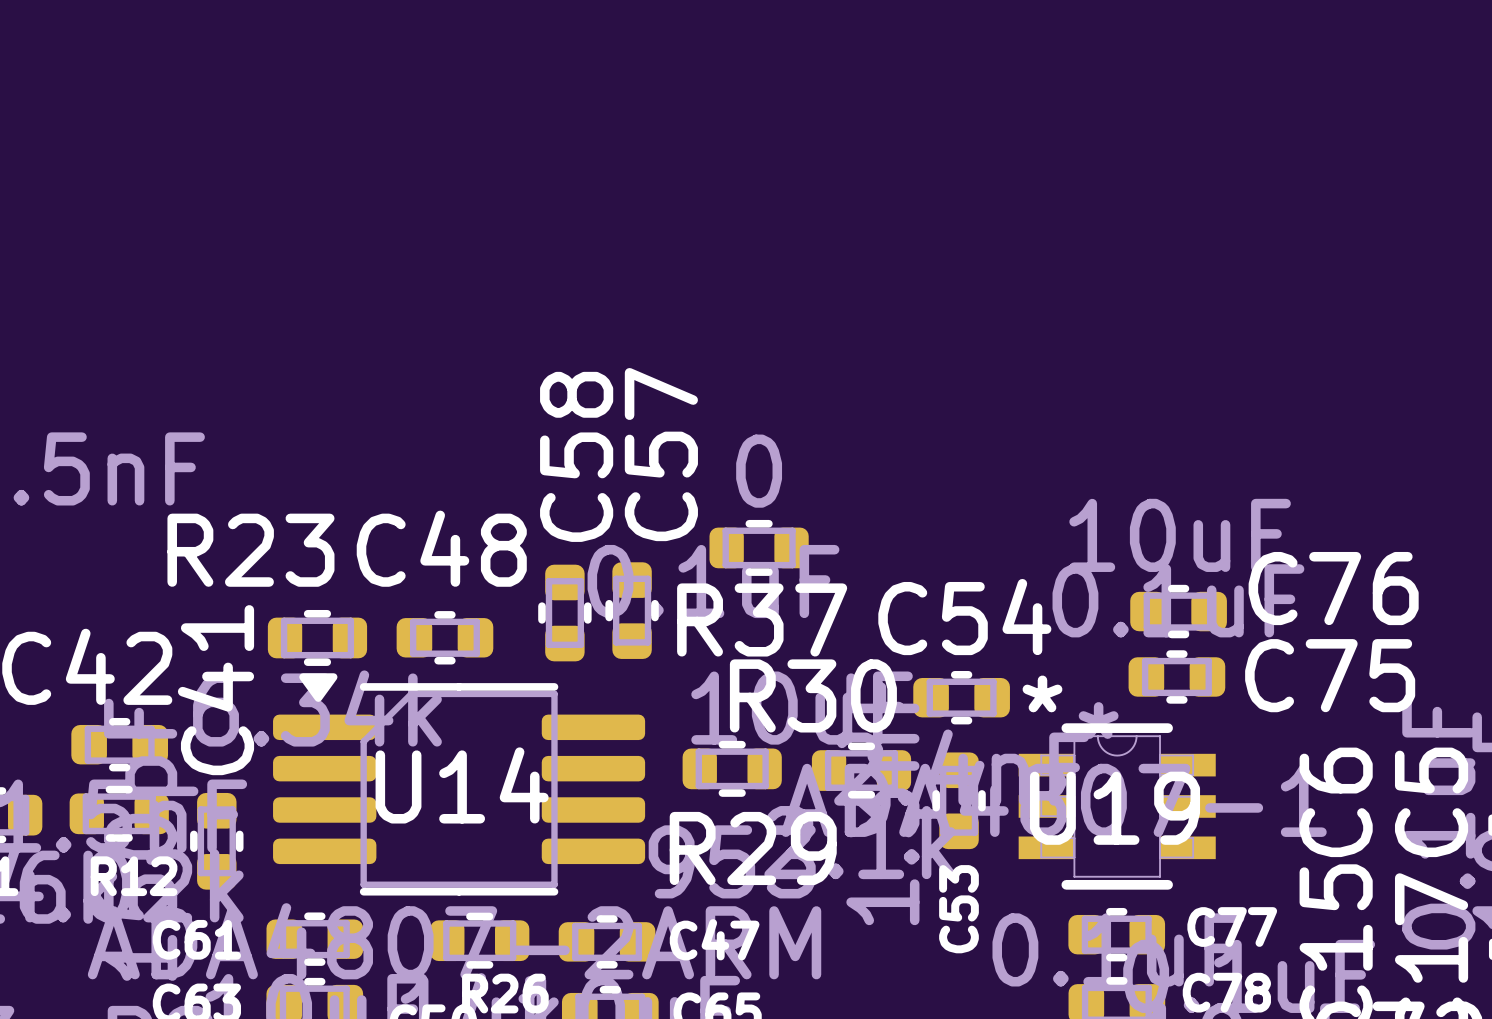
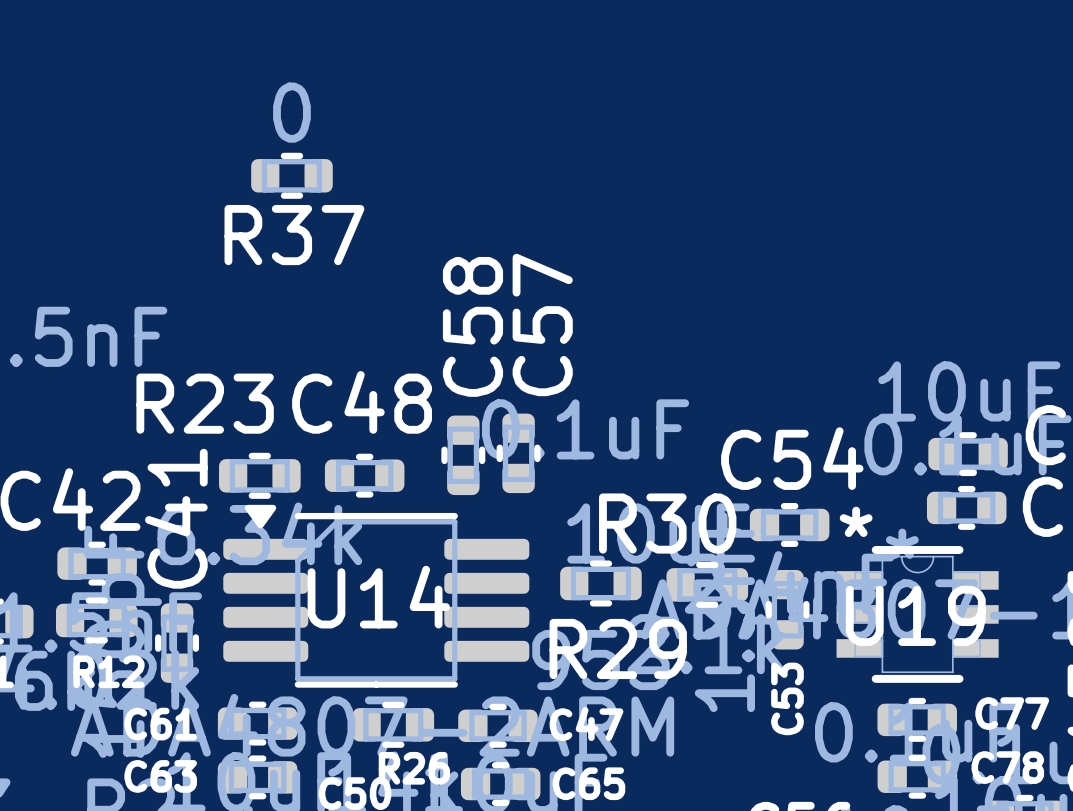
R37 position: (759, 547) -> (291, 175)

